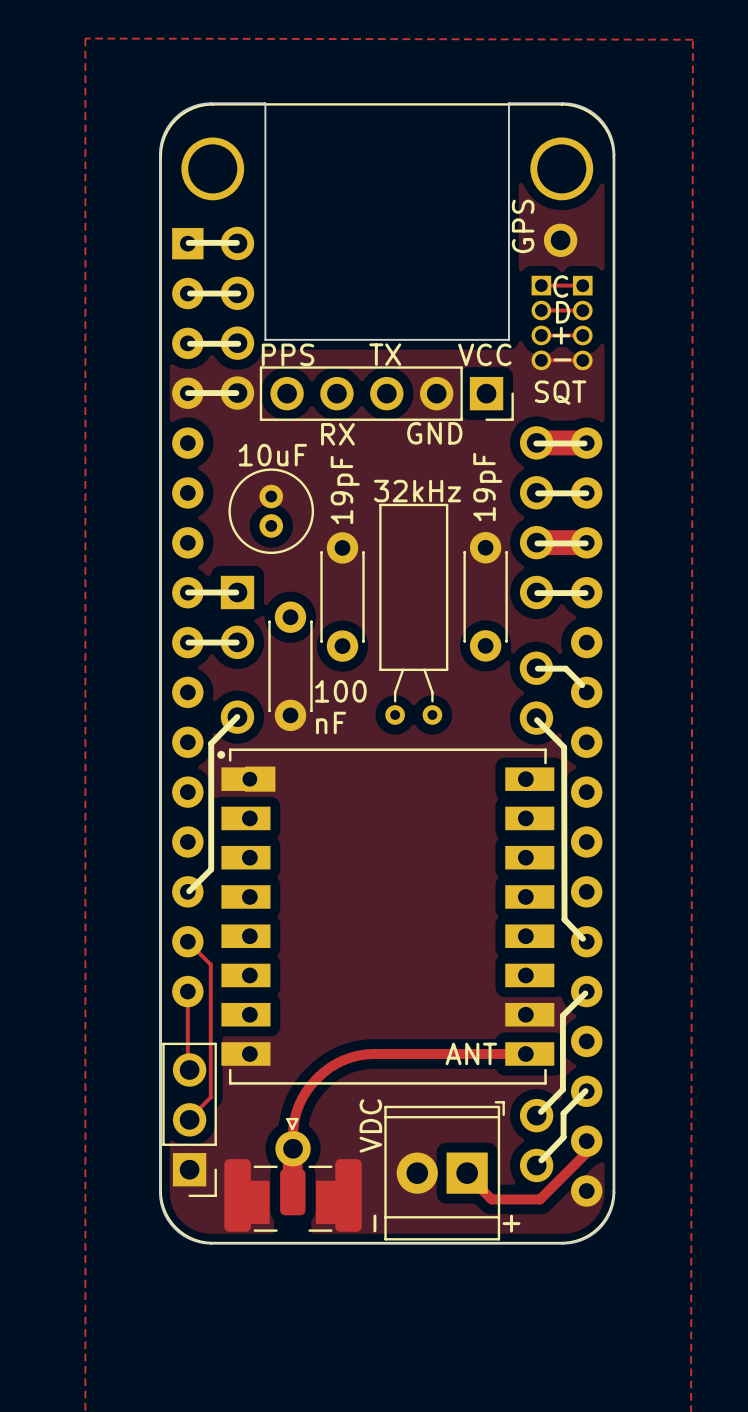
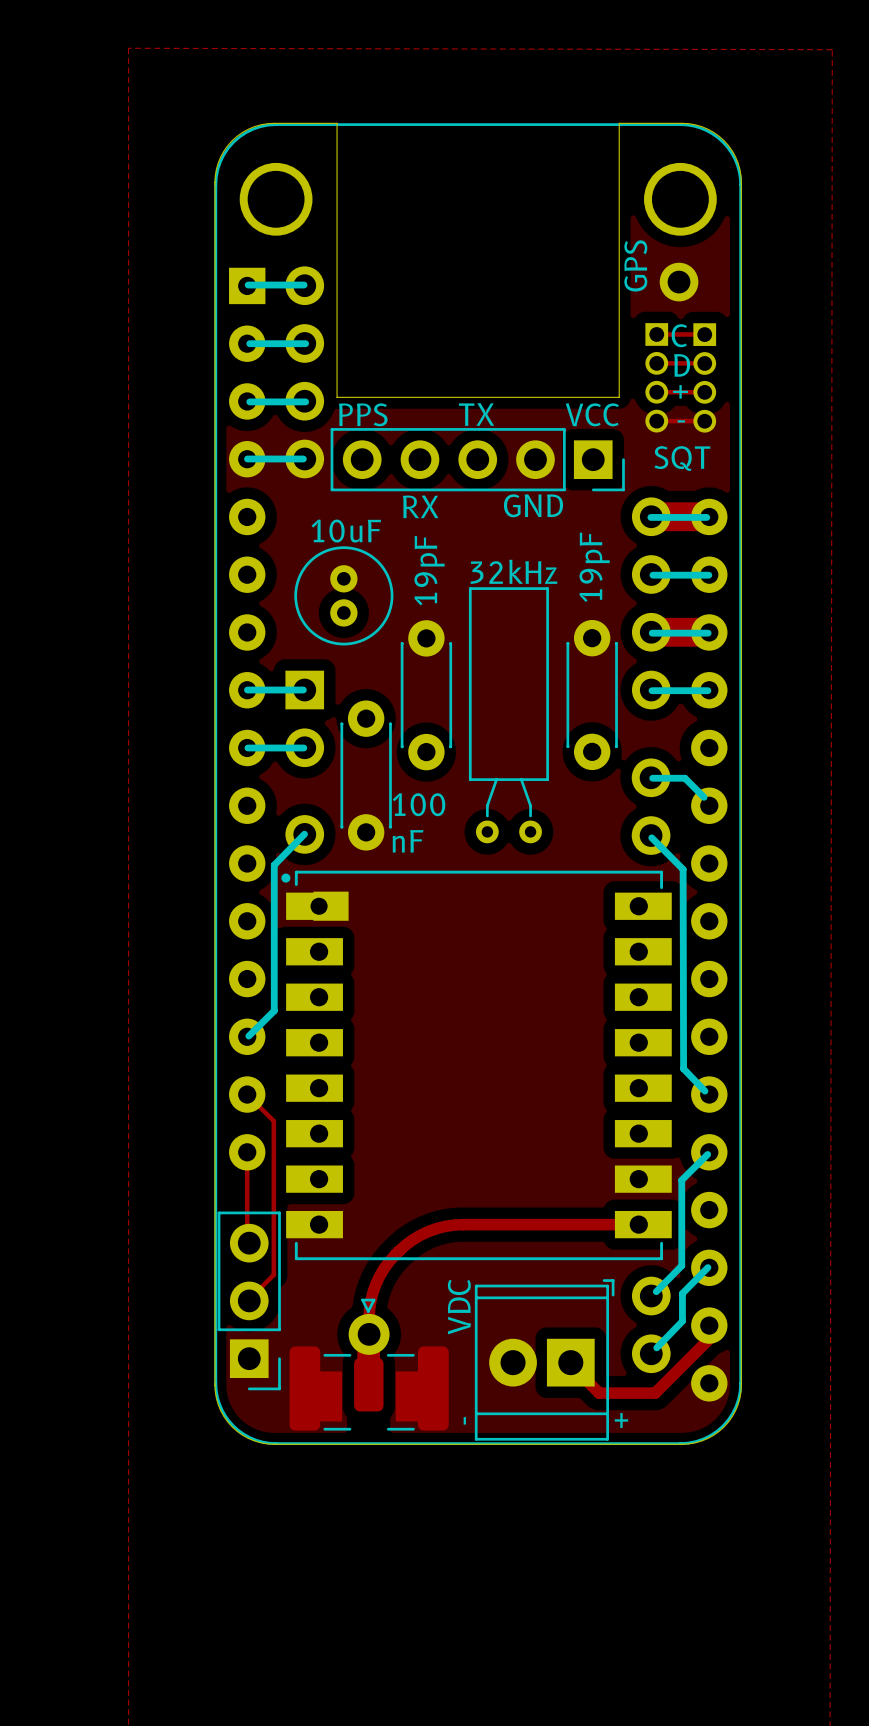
text: ANT (471, 1053) -> none

